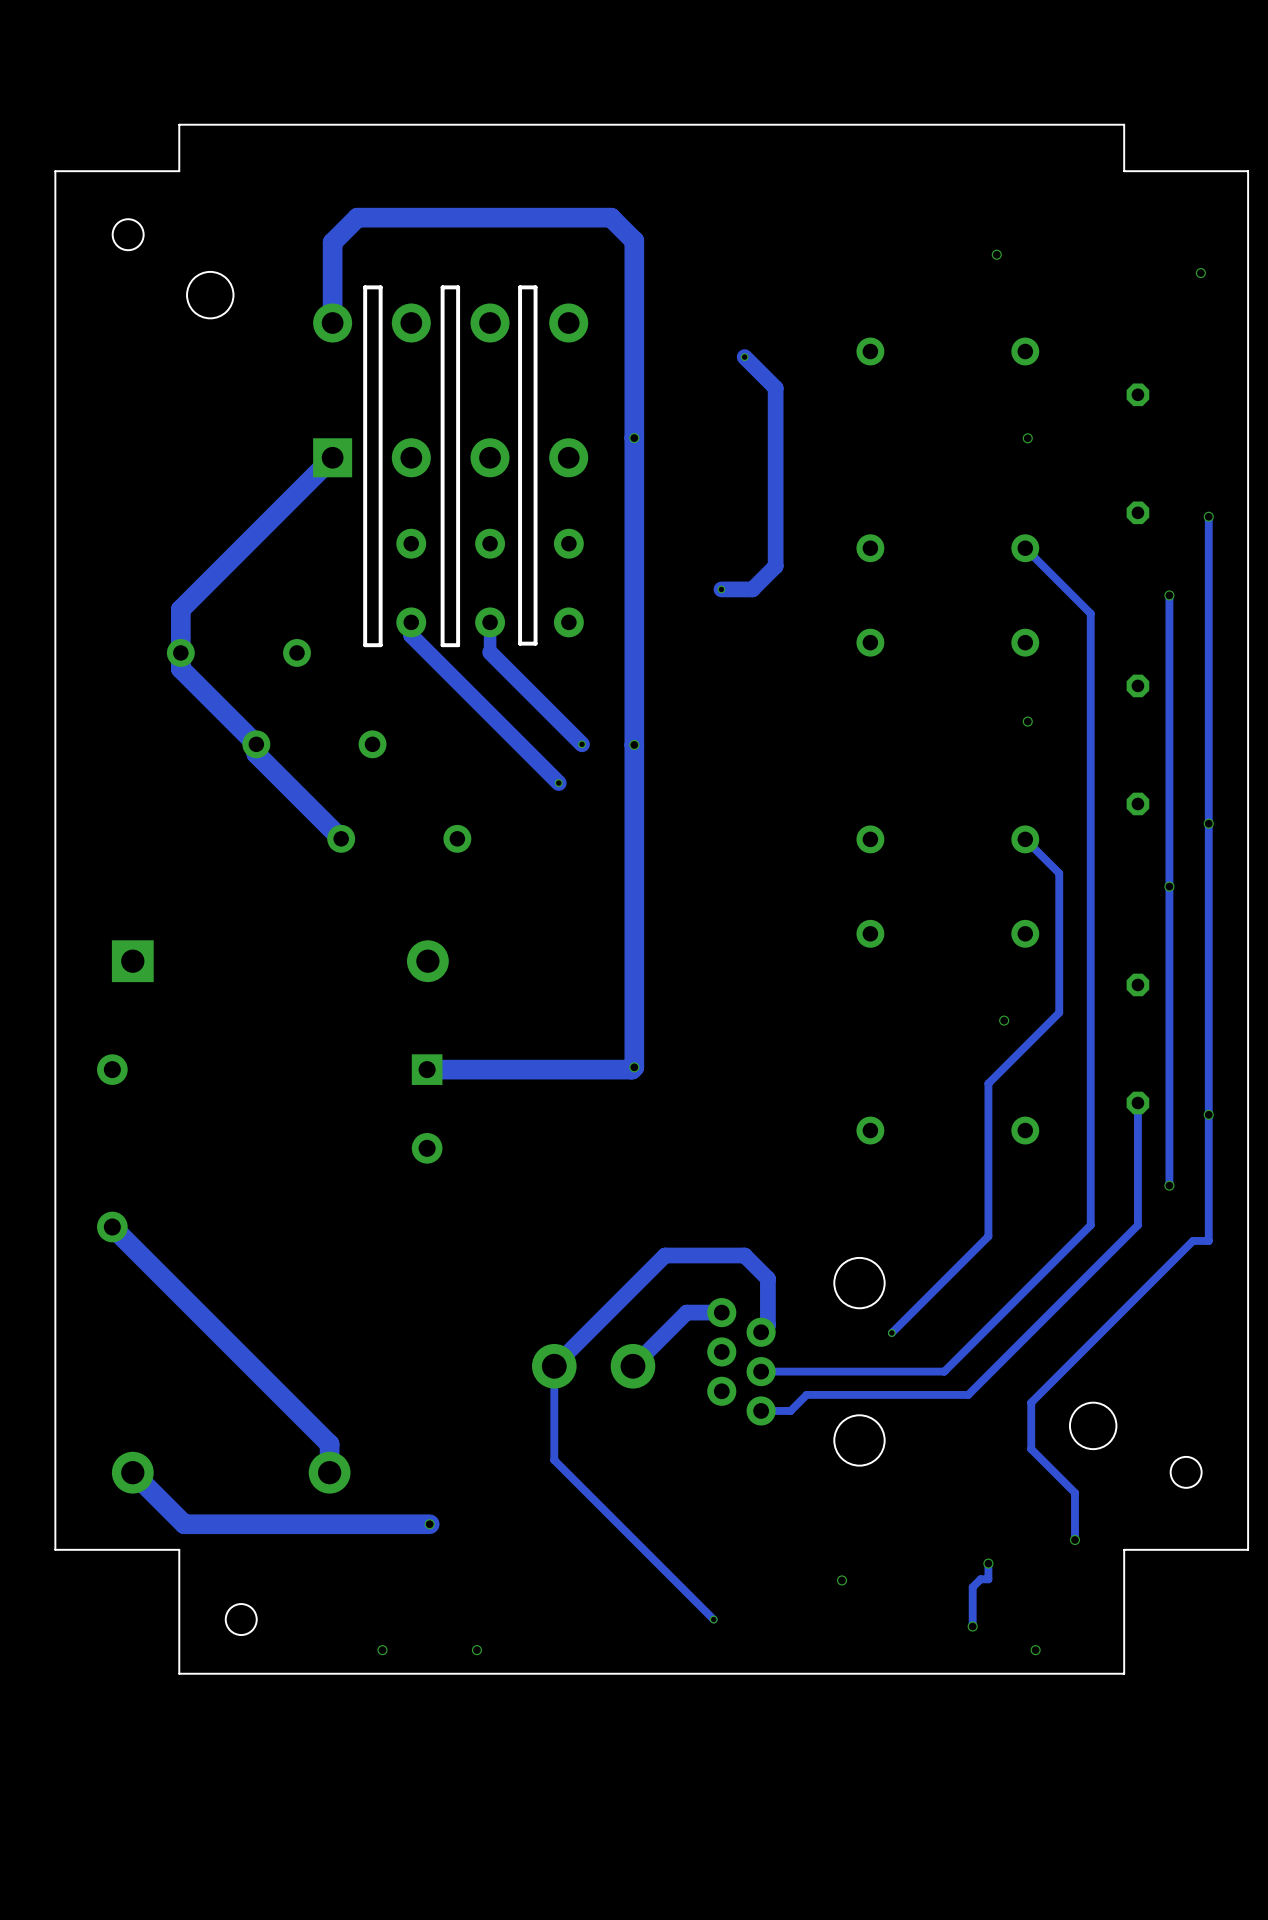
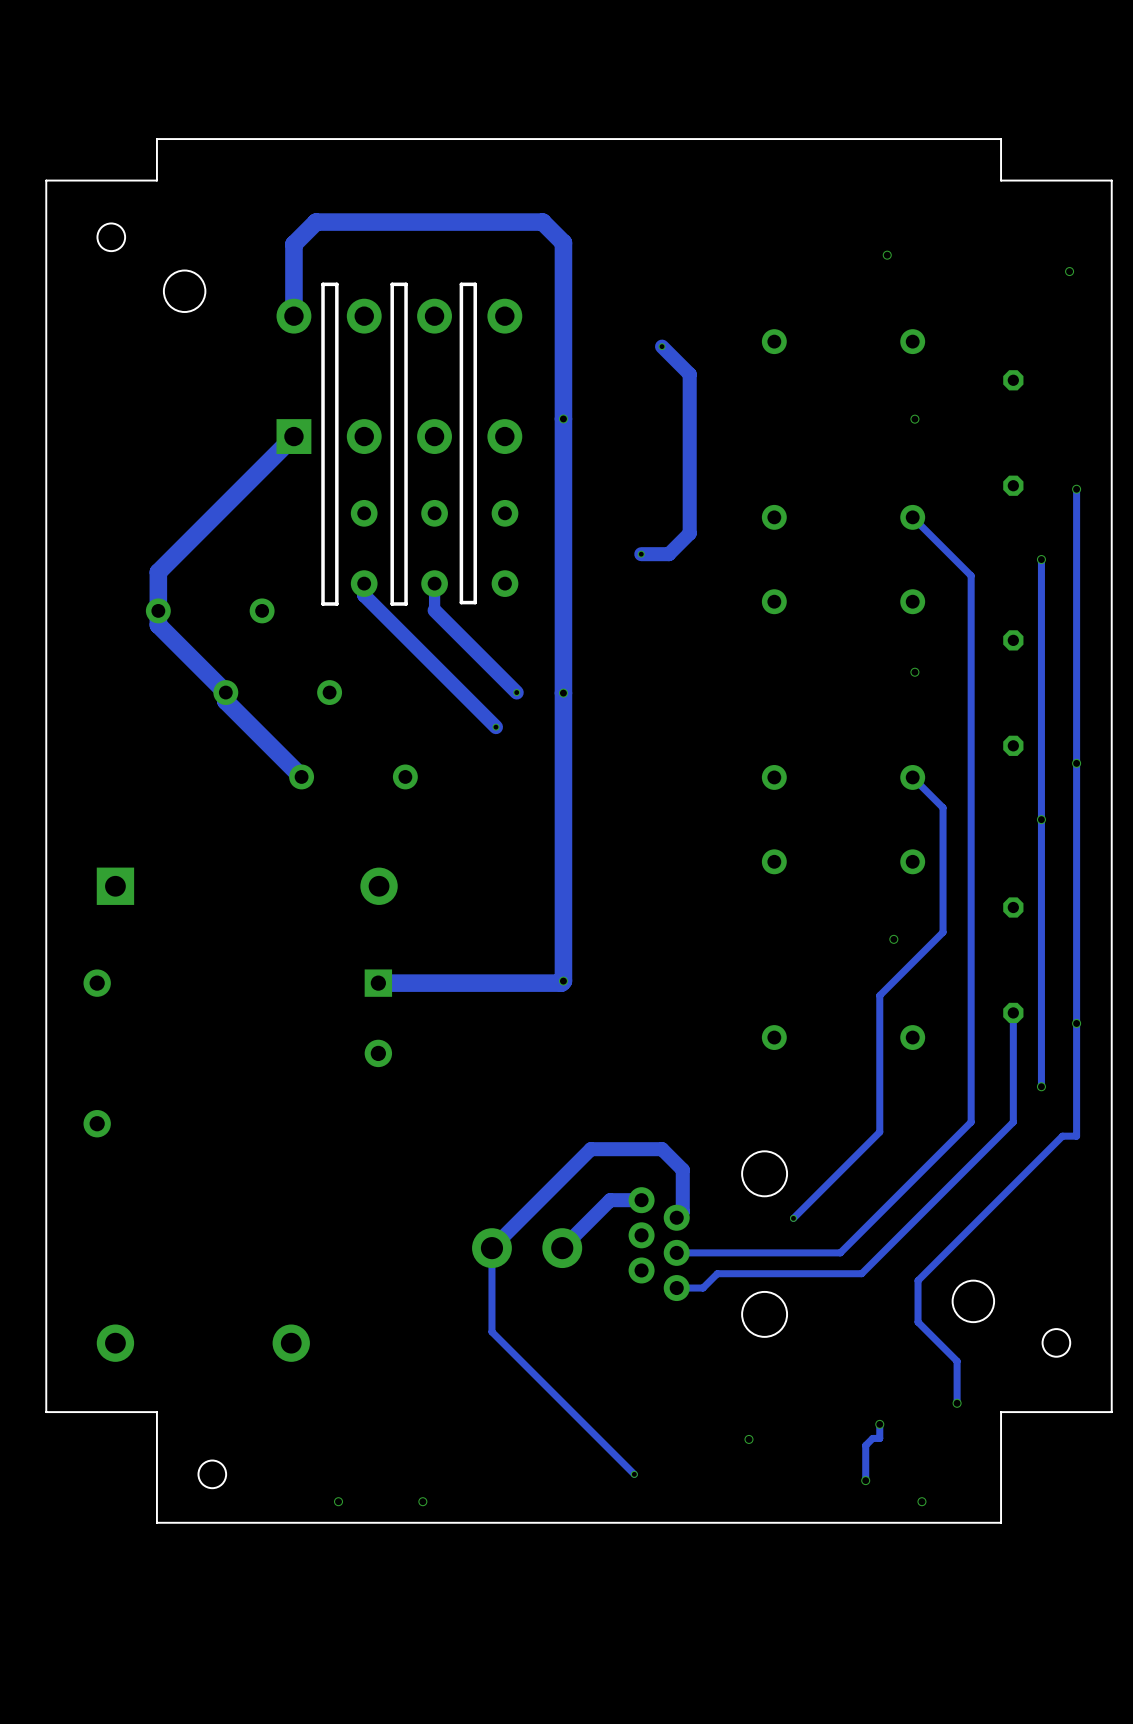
track: (112, 1227) (329, 1444) (329, 1472) -> none
track: (132, 1472) (184, 1524) (429, 1524) -> none
via: (429, 1524) -> none

